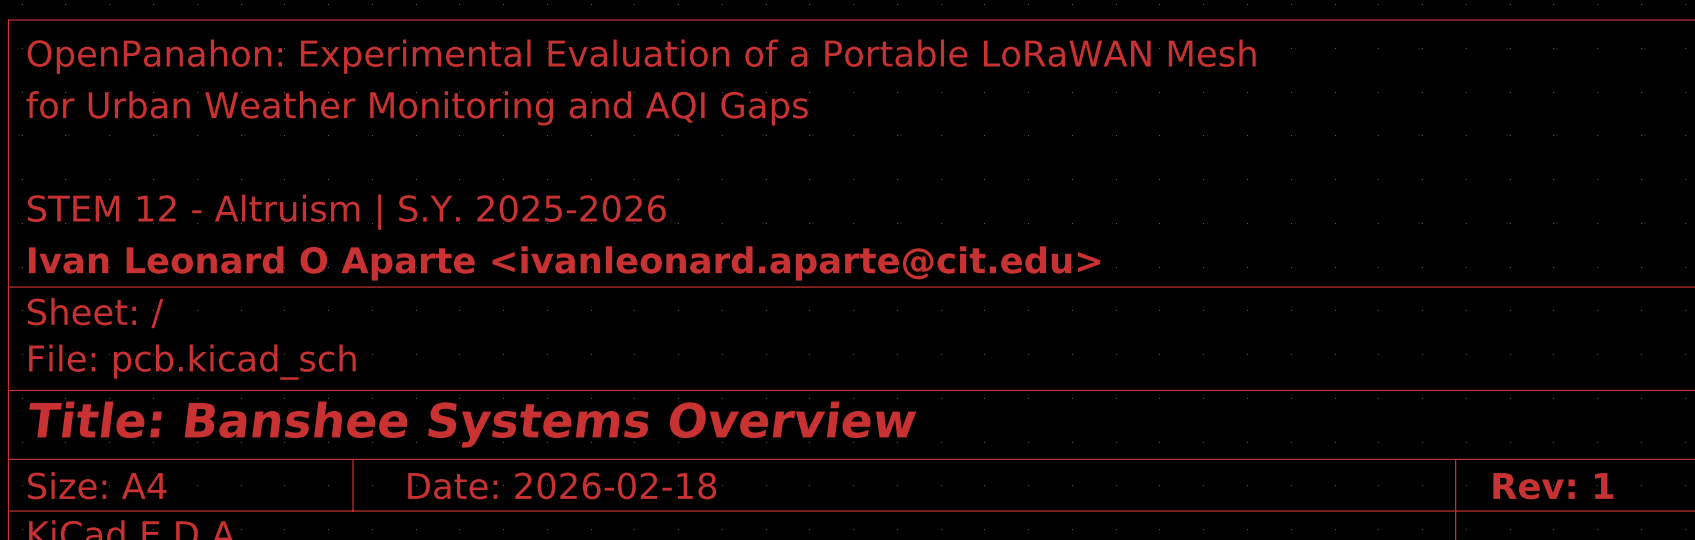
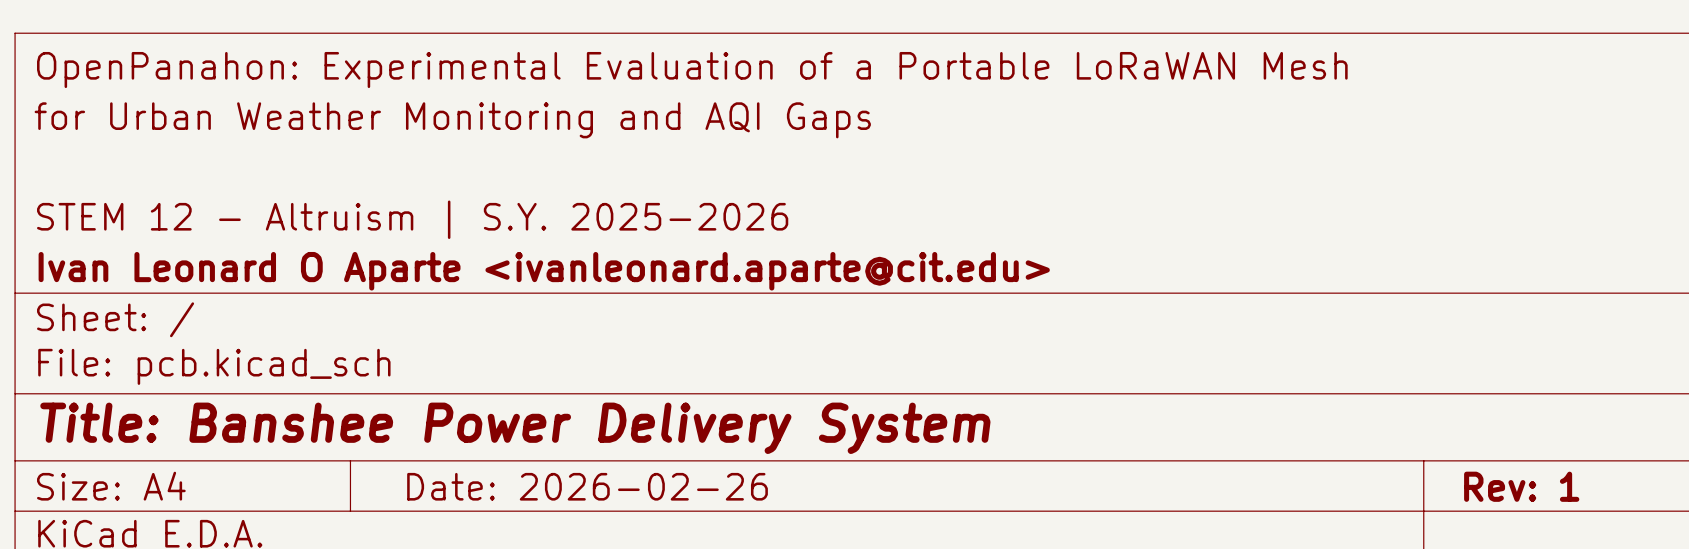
title block: Title: Banshee Systems Overview (472, 424) -> Title: Banshee Power Delivery System (515, 428)
title block: Date: 2026-02-18 (562, 485) -> Date: 2026-02-26 (587, 486)

